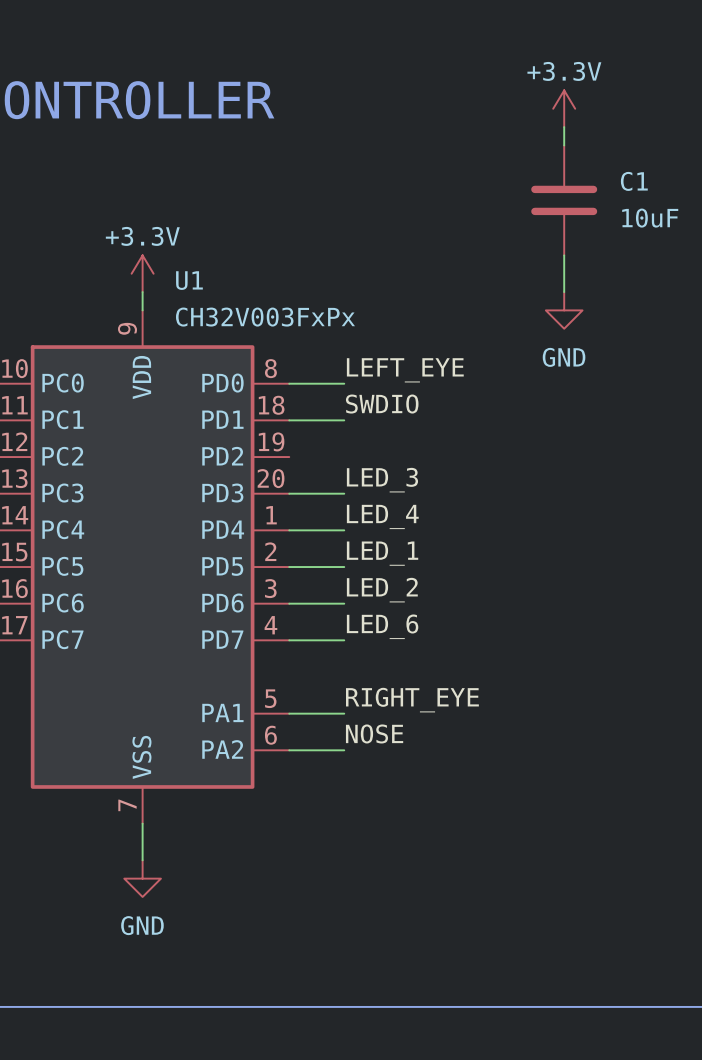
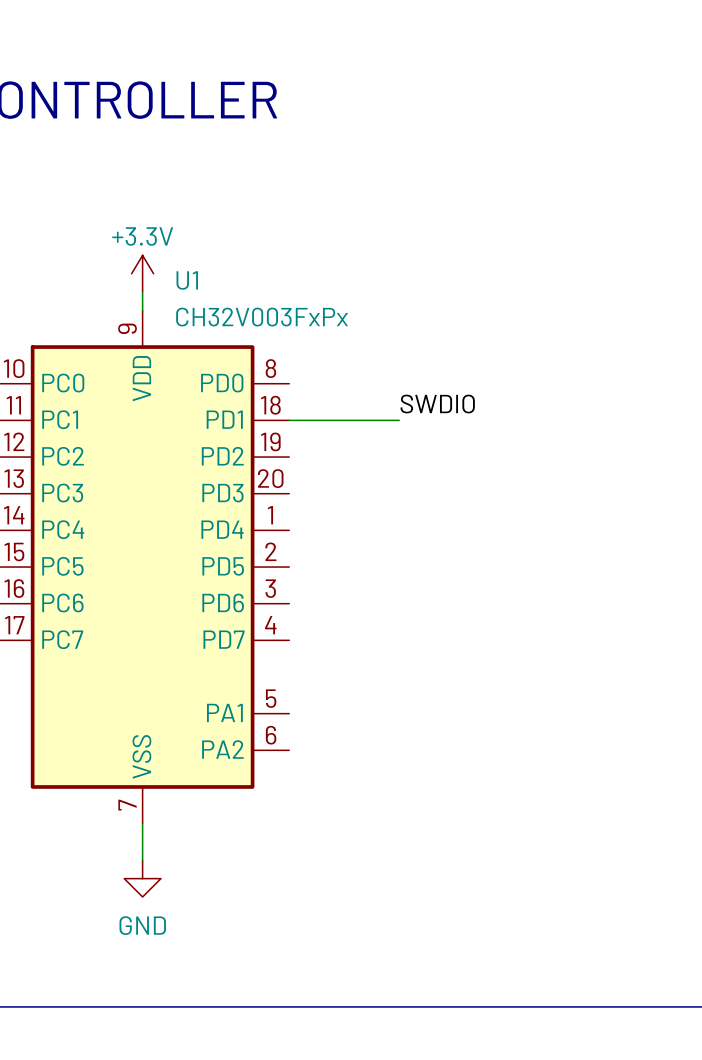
power symbol: +3.3V (564, 108) -> none
wire: (564, 127) (564, 145) -> none
C1: 10uF (564, 200) -> none
wire: (564, 255) (564, 292) -> none
power symbol: GND (564, 310) -> none
label: LEFT_EYE (405, 370) -> none
wire: (289, 383) (344, 383) -> (344, 420) (399, 420)
label position: SWDIO (382, 404) -> SWDIO (437, 404)
label: LED_3 (382, 480) -> none
wire: (289, 493) (344, 493) -> none
label: LED_4 (382, 516) -> none
wire: (289, 530) (344, 530) -> none
label: LED_1 (382, 553) -> none
wire: (289, 567) (344, 567) -> none
label: LED_2 (382, 590) -> none
wire: (289, 603) (344, 603) -> none
label: LED_6 (382, 626) -> none
wire: (289, 640) (344, 640) -> none
label: RIGHT_EYE (412, 700) -> none
wire: (289, 713) (344, 713) -> none
label: NOSE (374, 733) -> none
wire: (289, 750) (344, 750) -> none

